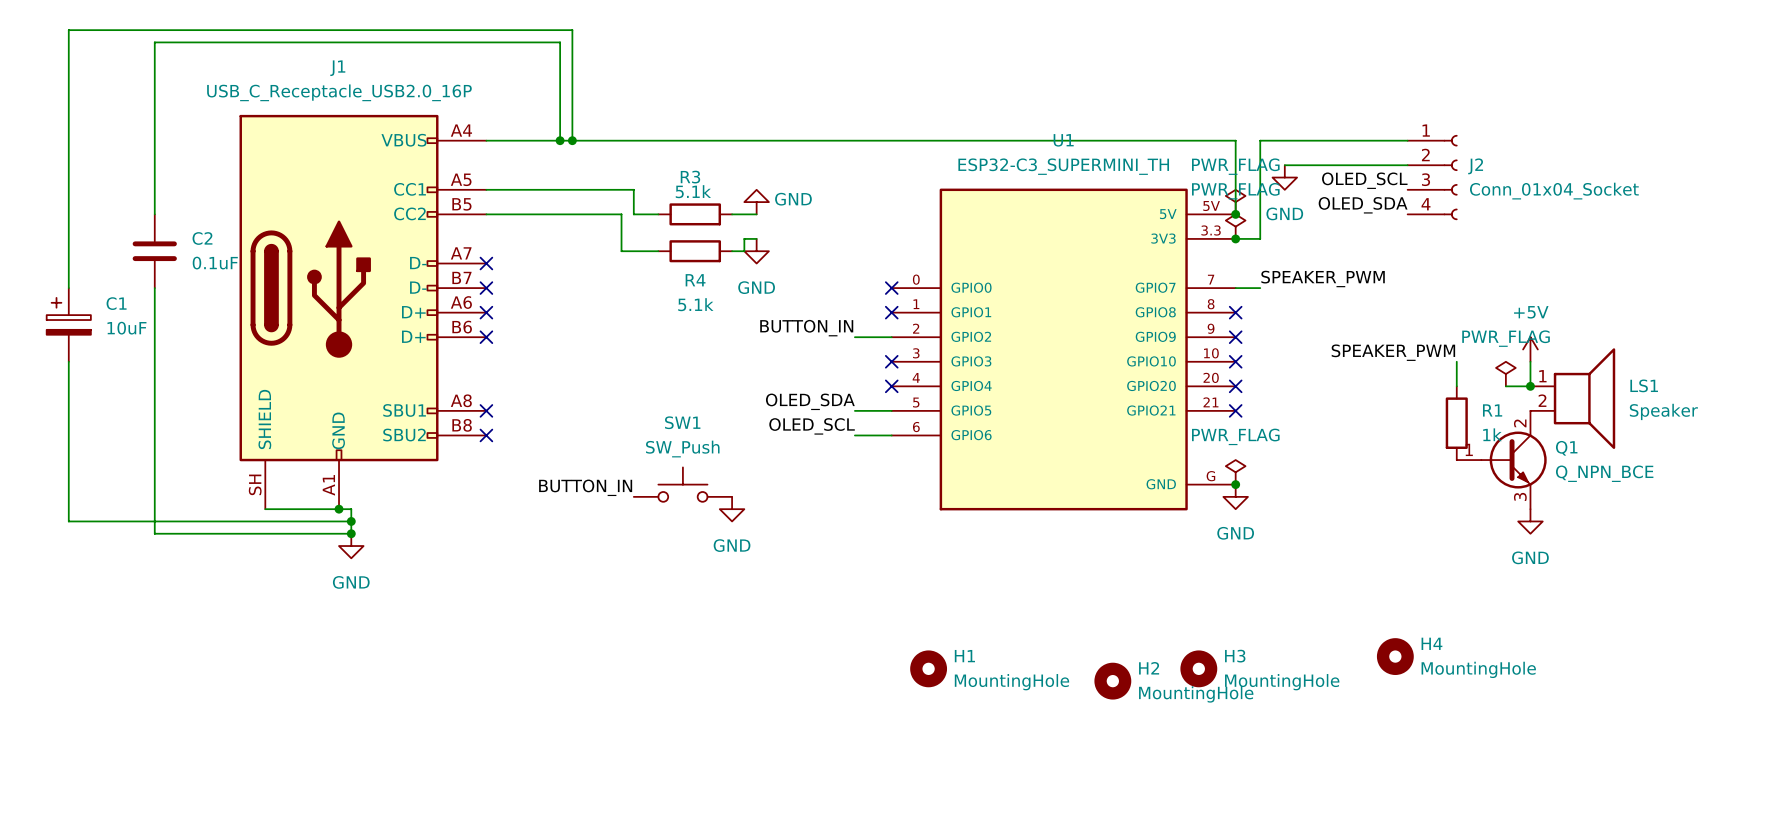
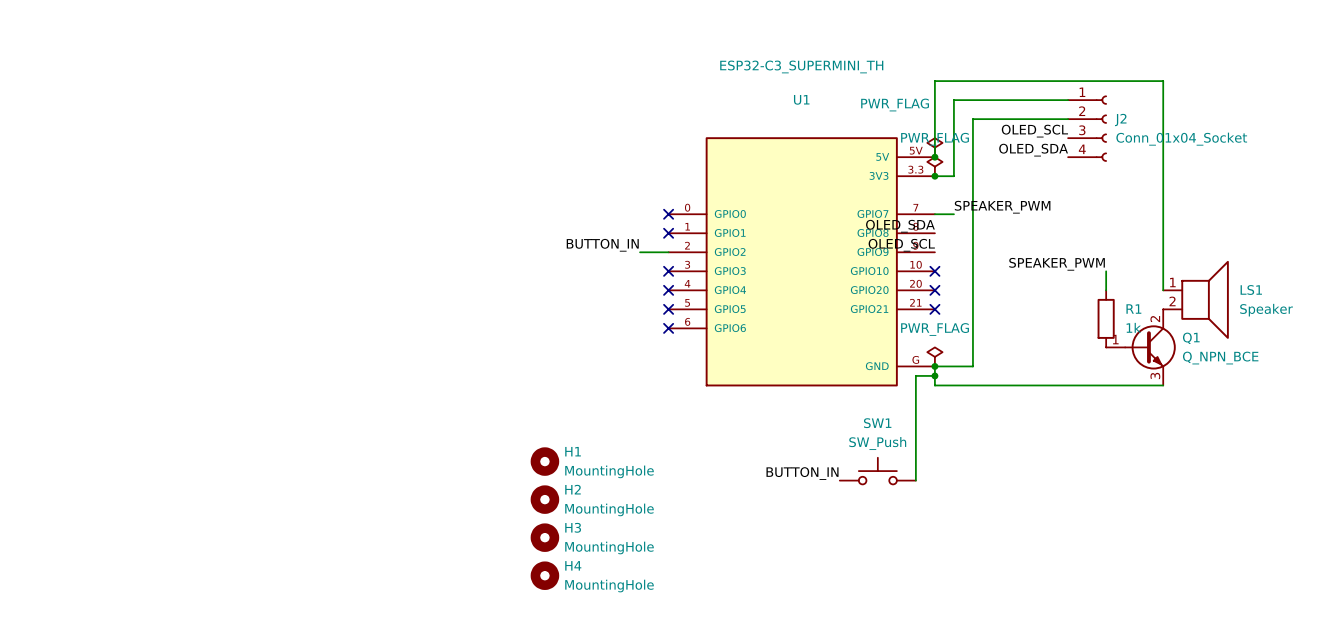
wire: (486, 140) (1235, 140) -> (1163, 271) (1163, 81) (934, 81) (934, 100)
wire: (560, 140) (560, 42) (154, 42) (154, 214) -> none
junction: (560, 140) -> none
wire: (572, 140) (572, 30) (68, 30) (68, 288) -> none
junction: (572, 140) -> none
wire: none -> (972, 119) (972, 366) (934, 366) (934, 385) (1163, 385)
U1 value position: ESP32-C3_SUPERMINI_TH (1063, 166) -> ESP32-C3_SUPERMINI_TH (801, 66)
power symbol text position: PWR_FLAG (1235, 166) -> PWR_FLAG (895, 105)
power symbol: GND (1284, 177) -> none
wire: (486, 189) (633, 189) (633, 214) (658, 214) -> none
power symbol: GND (756, 202) -> none
wire: (486, 214) (621, 214) (621, 251) (658, 251) -> none
R3: 5.1k (695, 214) -> none
wire: (732, 214) (756, 214) -> none
wire: (756, 238) (744, 238) (744, 251) (732, 251) -> none
C2: 0.1uF (154, 251) -> none
R4: 5.1k (695, 251) -> none
power symbol: GND (756, 251) -> none
no-connect mark: (486, 263) -> none
wire: (154, 288) (154, 533) (351, 533) (351, 509) (265, 509) -> none
no-connect mark: (486, 288) -> none
label: none -> OLED_SDA (900, 226)
J1: USB_C_Receptacle_USB2.0_16P (362, 312) -> none
no-connect mark: (486, 312) -> none
no-connect mark: (1235, 312) -> none
C1: 10uF (68, 324) -> none
label: none -> OLED_SCL (901, 245)
no-connect mark: (486, 337) -> none
no-connect mark: (1235, 337) -> none
power symbol: +5V (1530, 349) -> none
wire: (68, 361) (68, 521) (351, 521) -> none
power symbol: PWR_FLAG (1505, 374) -> none
wire: (1505, 386) (1530, 386) -> none
junction: (1530, 386) -> none
label: OLED_SDA (810, 401) -> none
no-connect mark: (486, 410) -> none
wire: (854, 410) (891, 410) -> none
no-connect mark: none -> (668, 309)
label: OLED_SCL (812, 426) -> none
no-connect mark: (486, 435) -> none
wire: (854, 435) (891, 435) -> none
no-connect mark: none -> (668, 328)
SW1 position: (682, 484) -> (877, 471)
label: BUTTON_IN (585, 487) -> none
wire: none -> (934, 375) (915, 375) (915, 480)
junction: none -> (934, 375)
power symbol: GND (1235, 496) -> none
junction: (339, 509) -> none
power symbol: GND (732, 509) -> none
junction: (351, 521) -> none
power symbol: GND (1530, 521) -> none
junction: (351, 533) -> none
power symbol: GND (351, 546) -> none
label: none -> BUTTON_IN (802, 473)
H4 position: (1395, 656) -> (544, 575)
H1 position: (928, 668) -> (544, 461)
H3 position: (1198, 668) -> (544, 537)
H2 position: (1112, 681) -> (544, 499)

